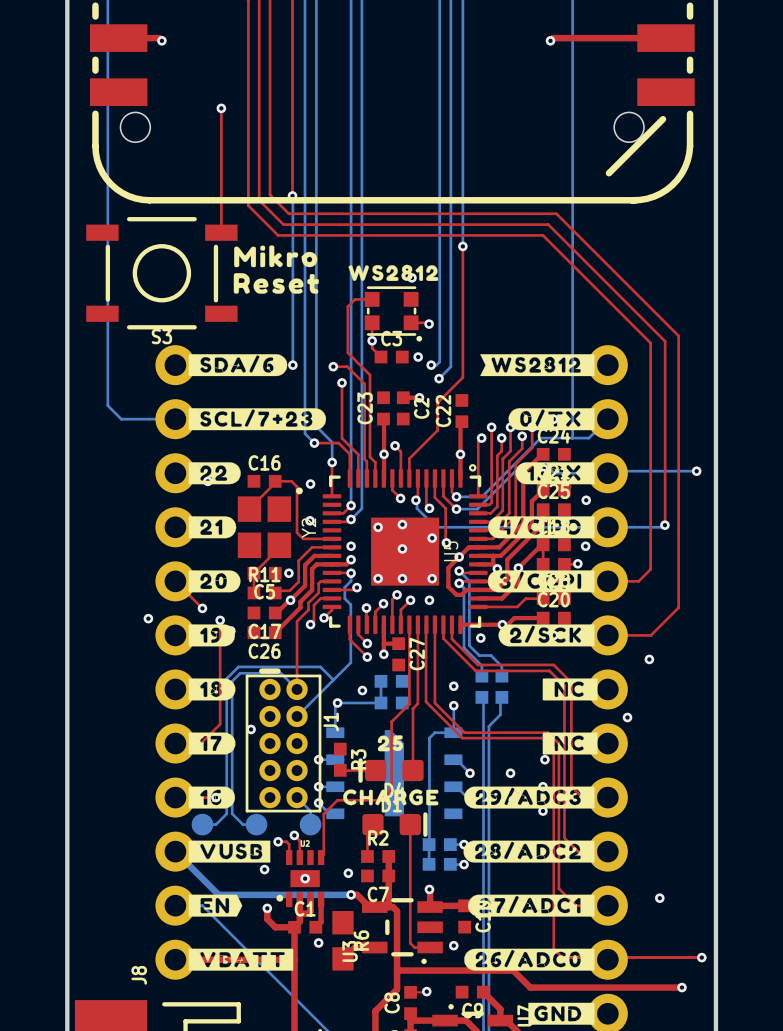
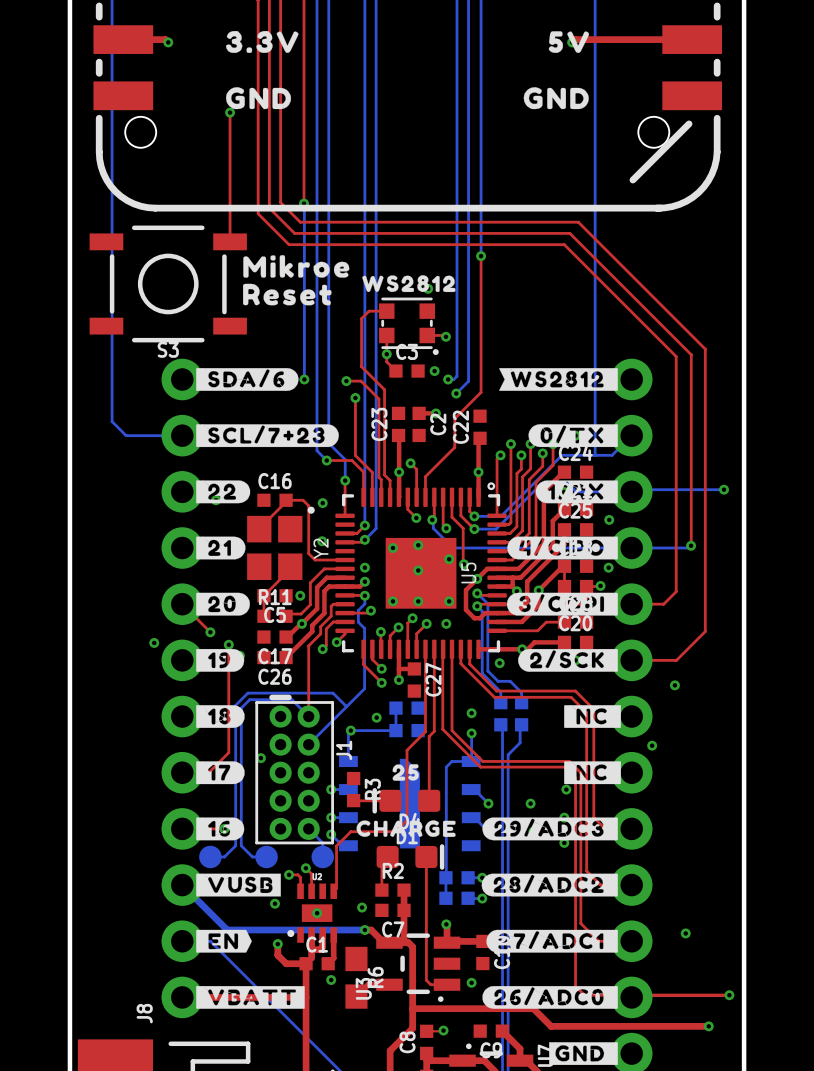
drawing: none -> [225, 31, 299, 53]
drawing: none -> [548, 31, 590, 53]
drawing: none -> [225, 87, 292, 110]
drawing: none -> [523, 87, 589, 110]
drawing shape: [234, 245, 318, 268] -> [243, 255, 350, 278]

